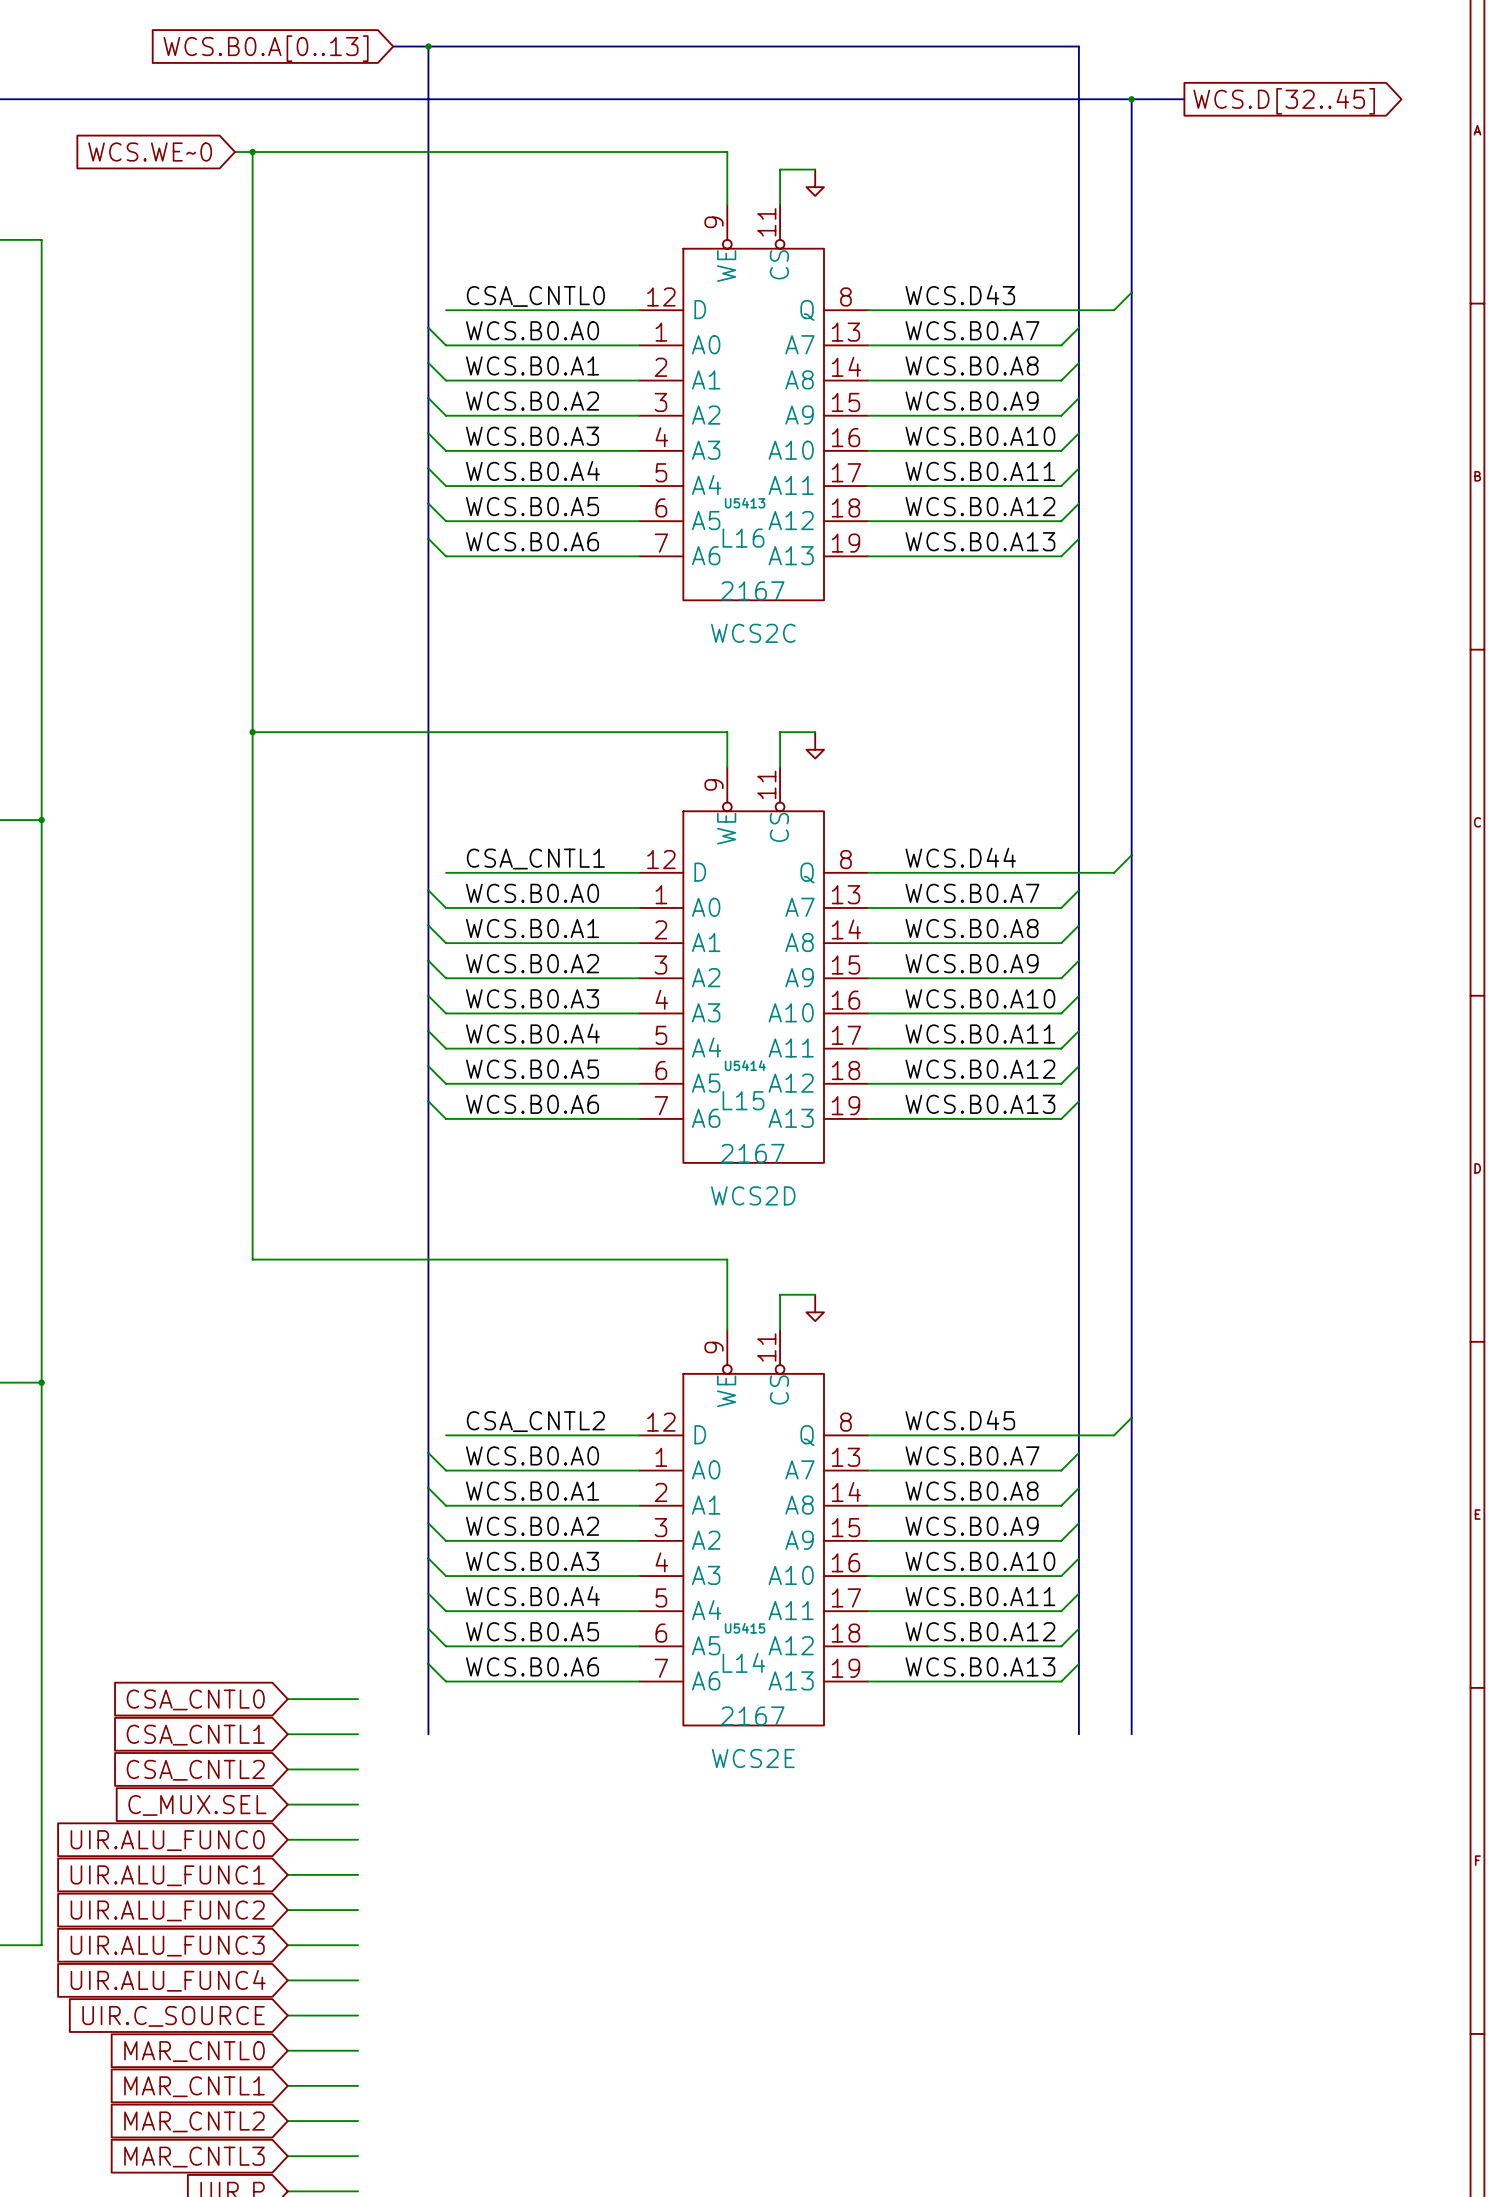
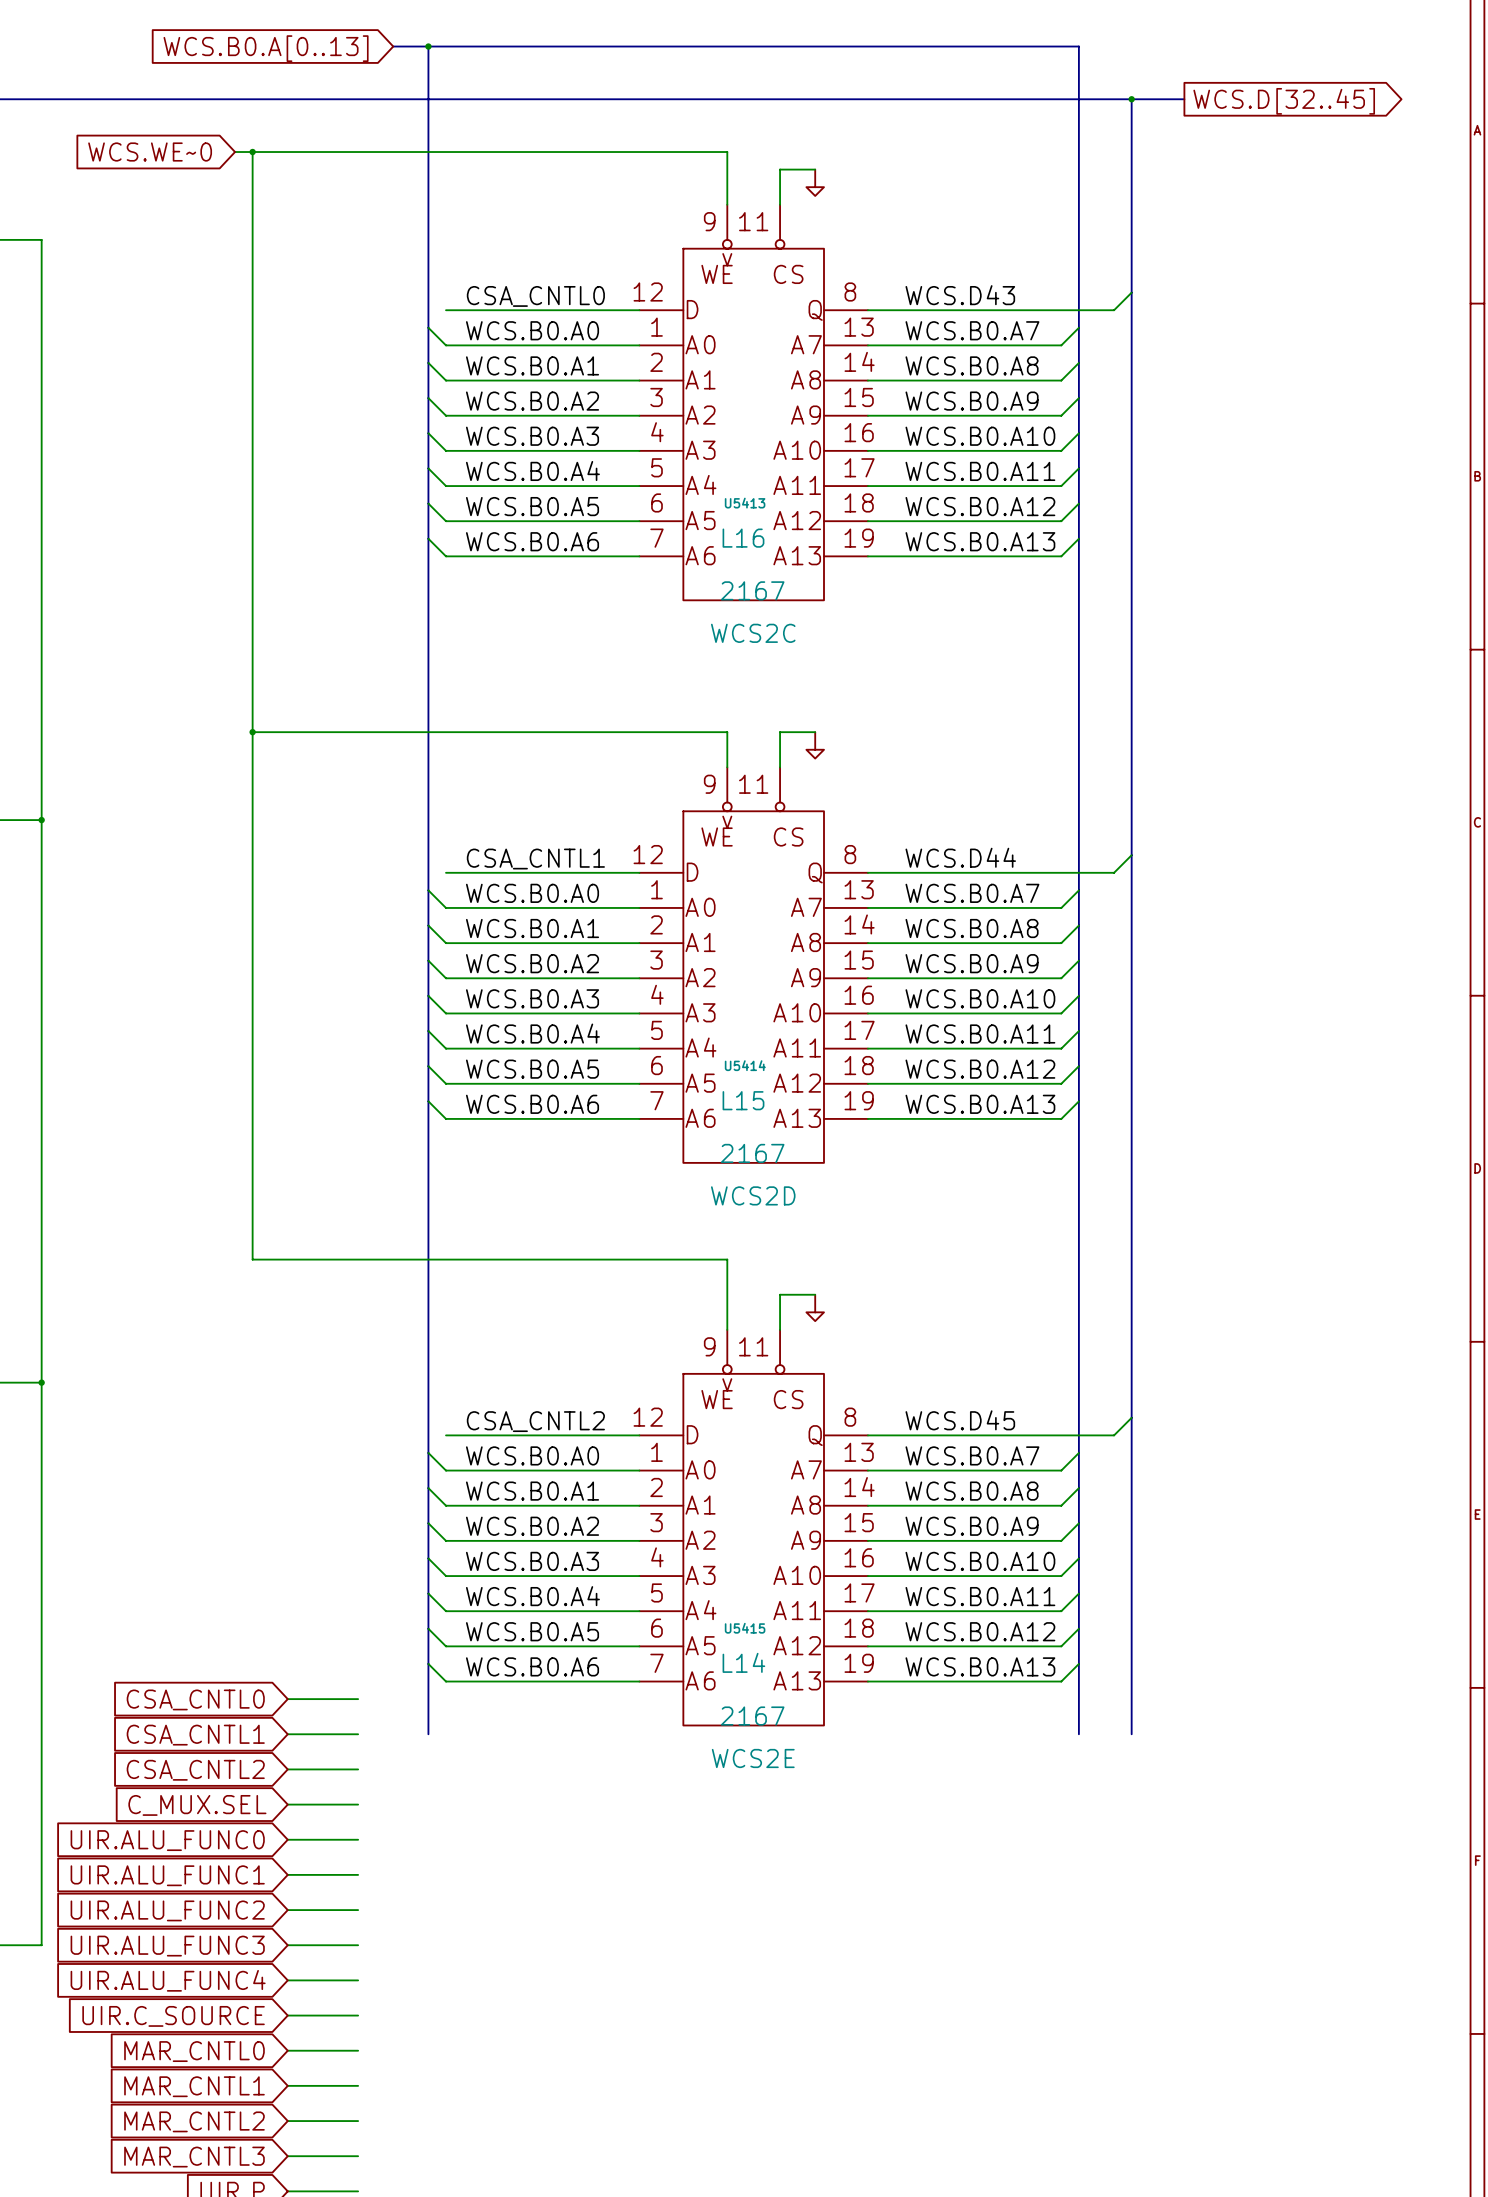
U5413 symbol: [639, 204, 868, 601] -> [639, 204, 868, 601]
U5414 symbol: [639, 767, 868, 1163] -> [639, 767, 868, 1163]
U5415 symbol: [639, 1329, 868, 1726] -> [639, 1329, 868, 1726]

